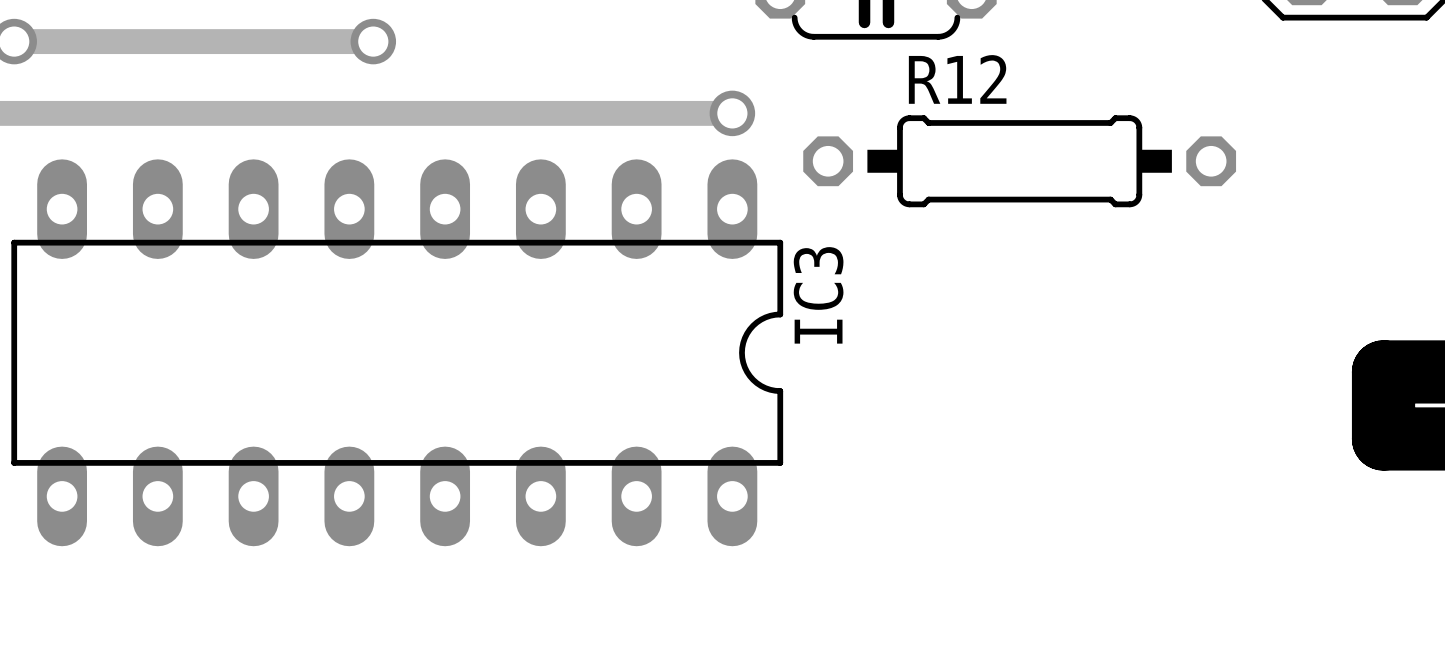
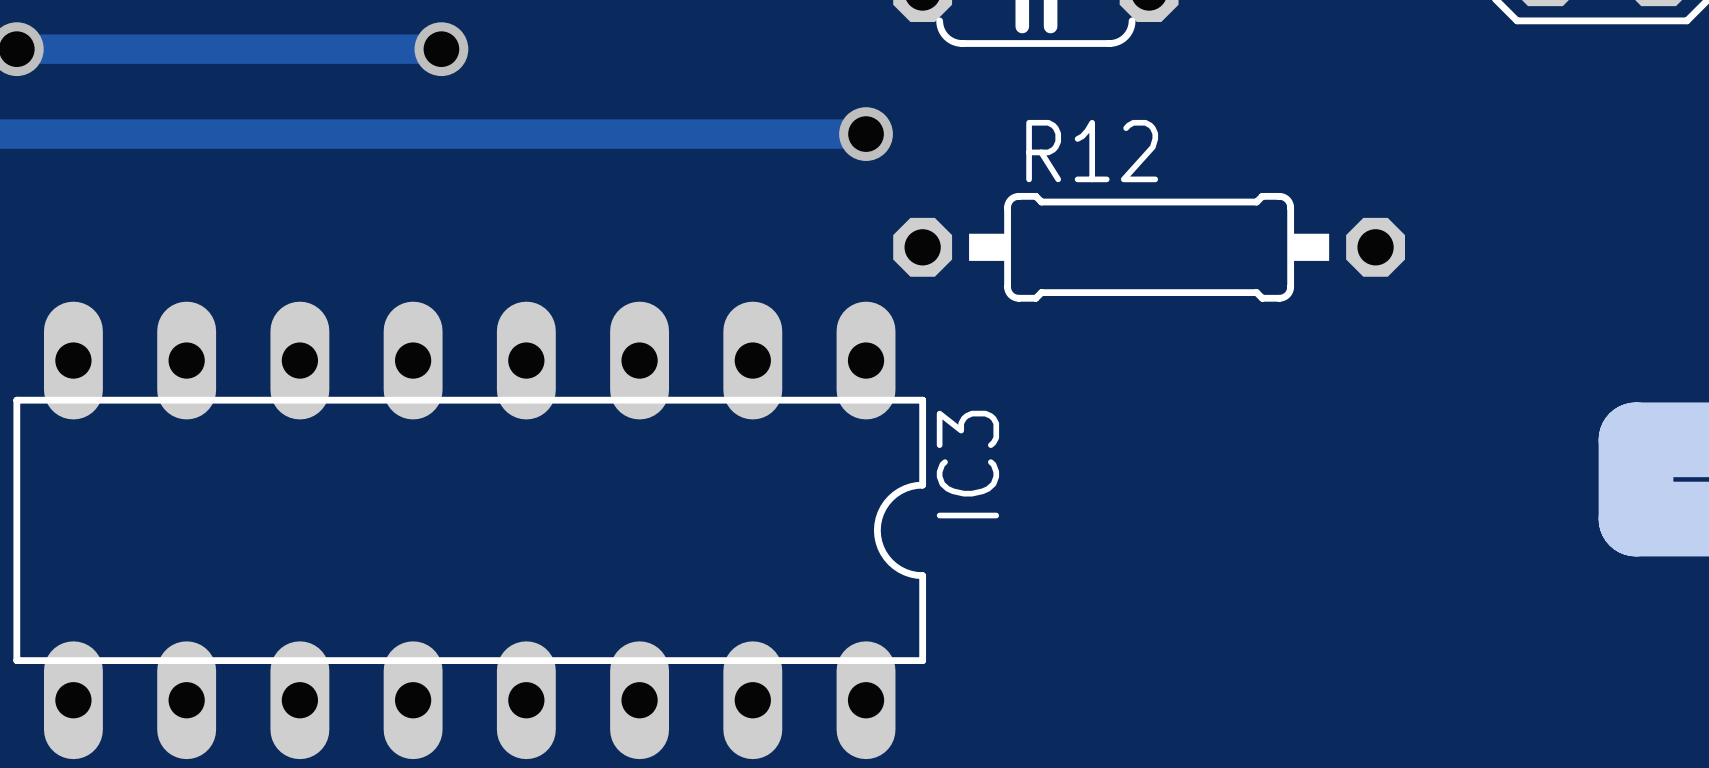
R12 position: (1019, 161) -> (1149, 247)
IC3 position: (397, 352) -> (469, 530)

